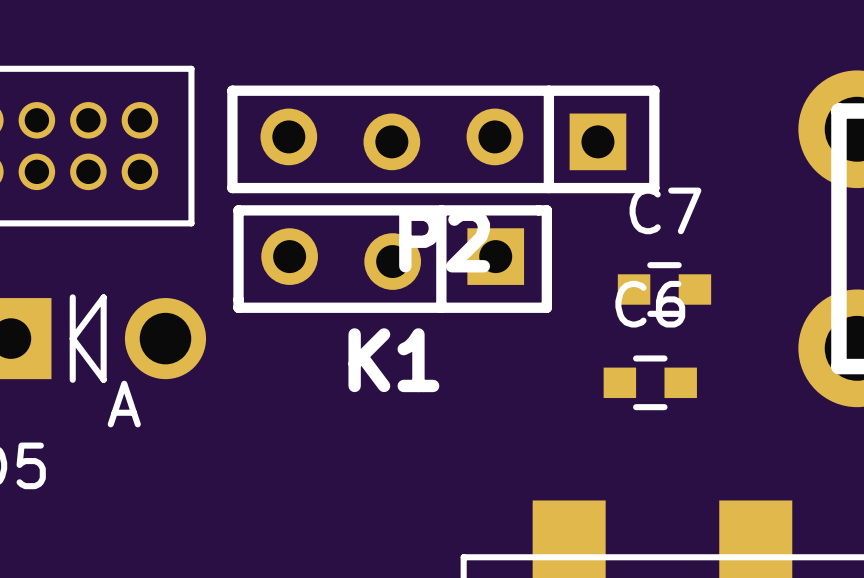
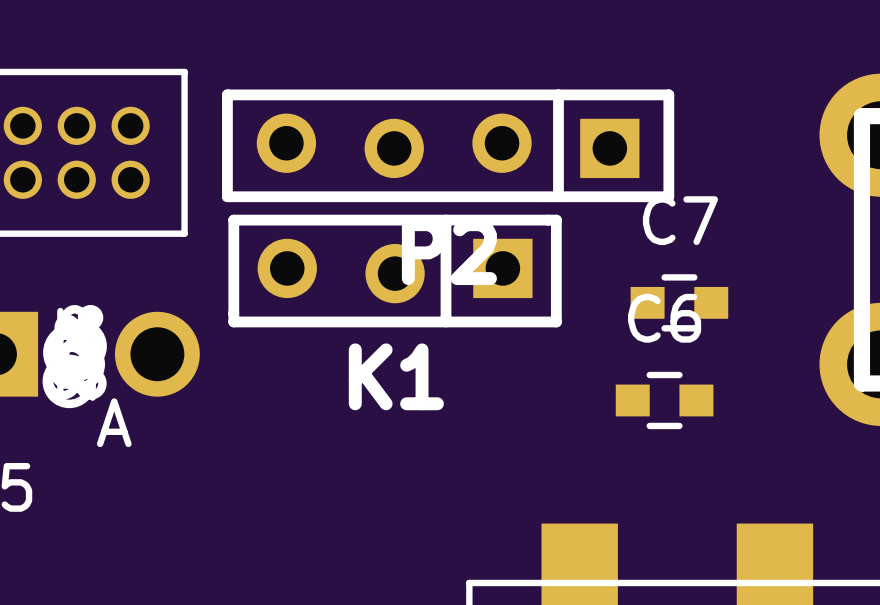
drawing: none -> [42, 304, 107, 409]

